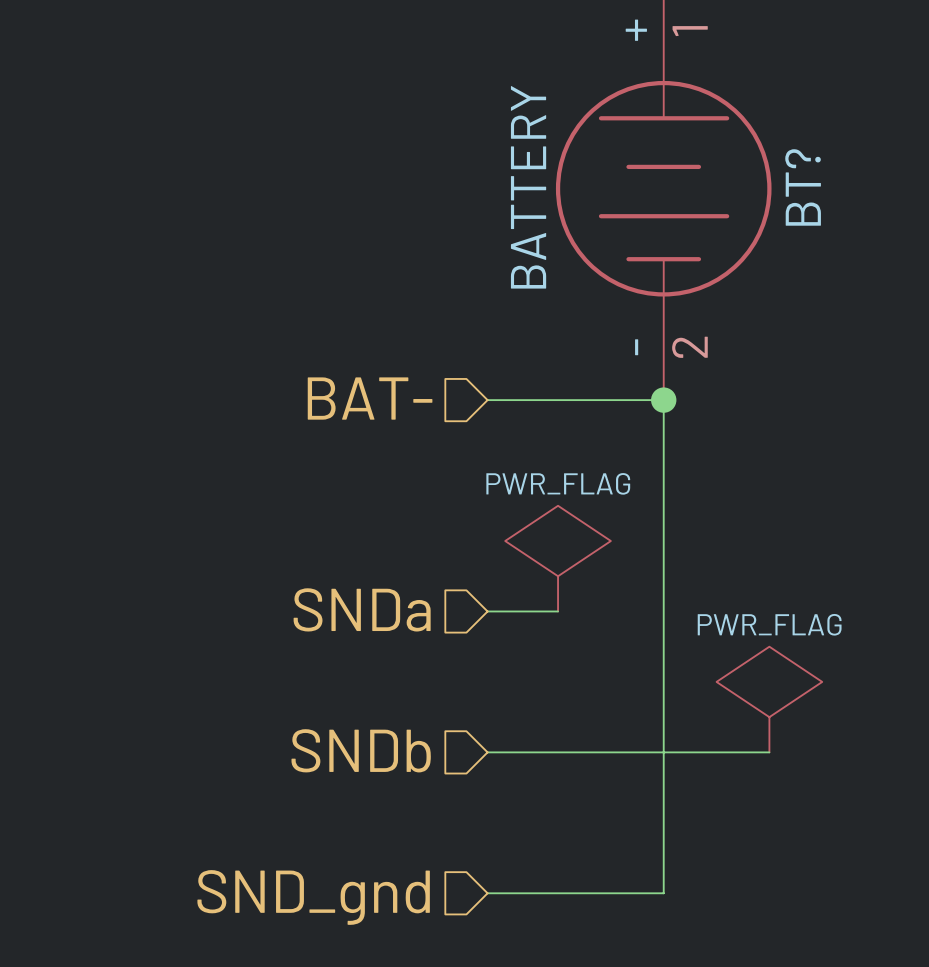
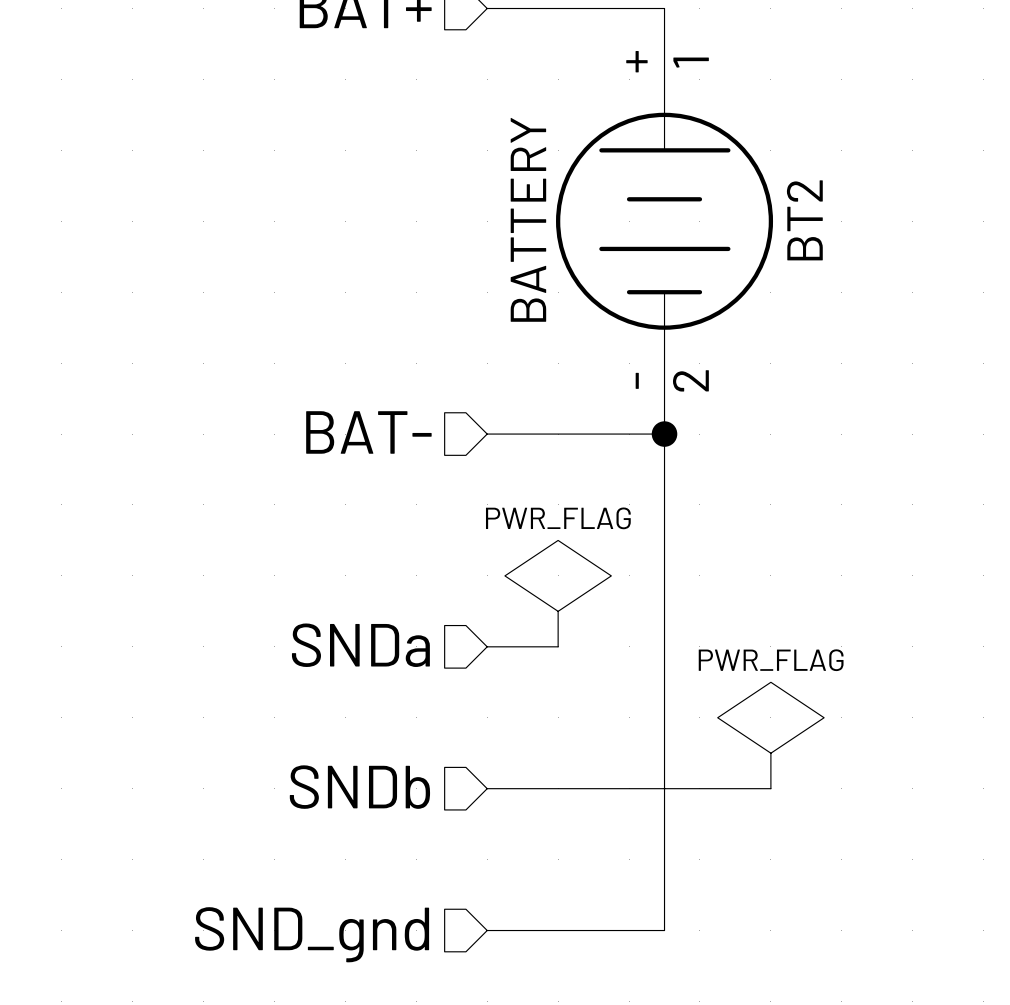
BT? name: BT? (803, 187) -> BT2 (804, 220)

